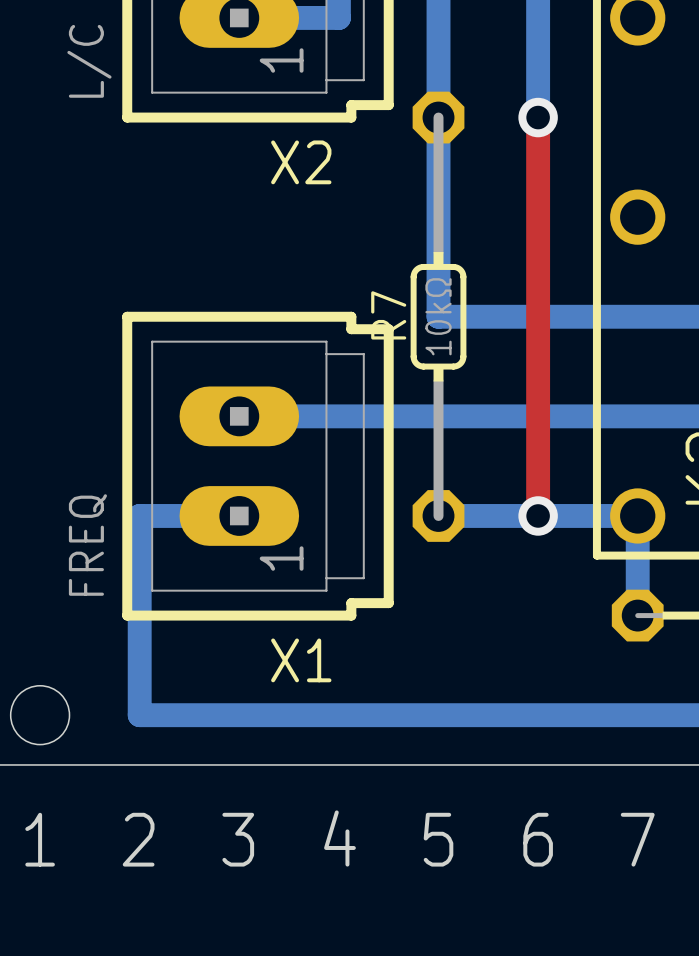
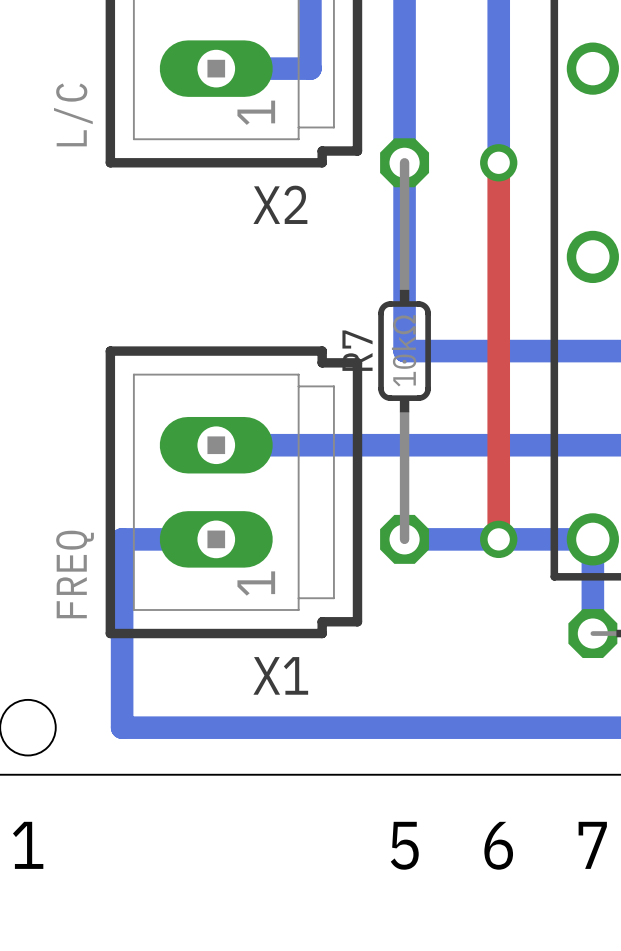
text: 4 (339, 838) -> none
text: 2 (138, 839) -> none
text: 3 (238, 839) -> none

